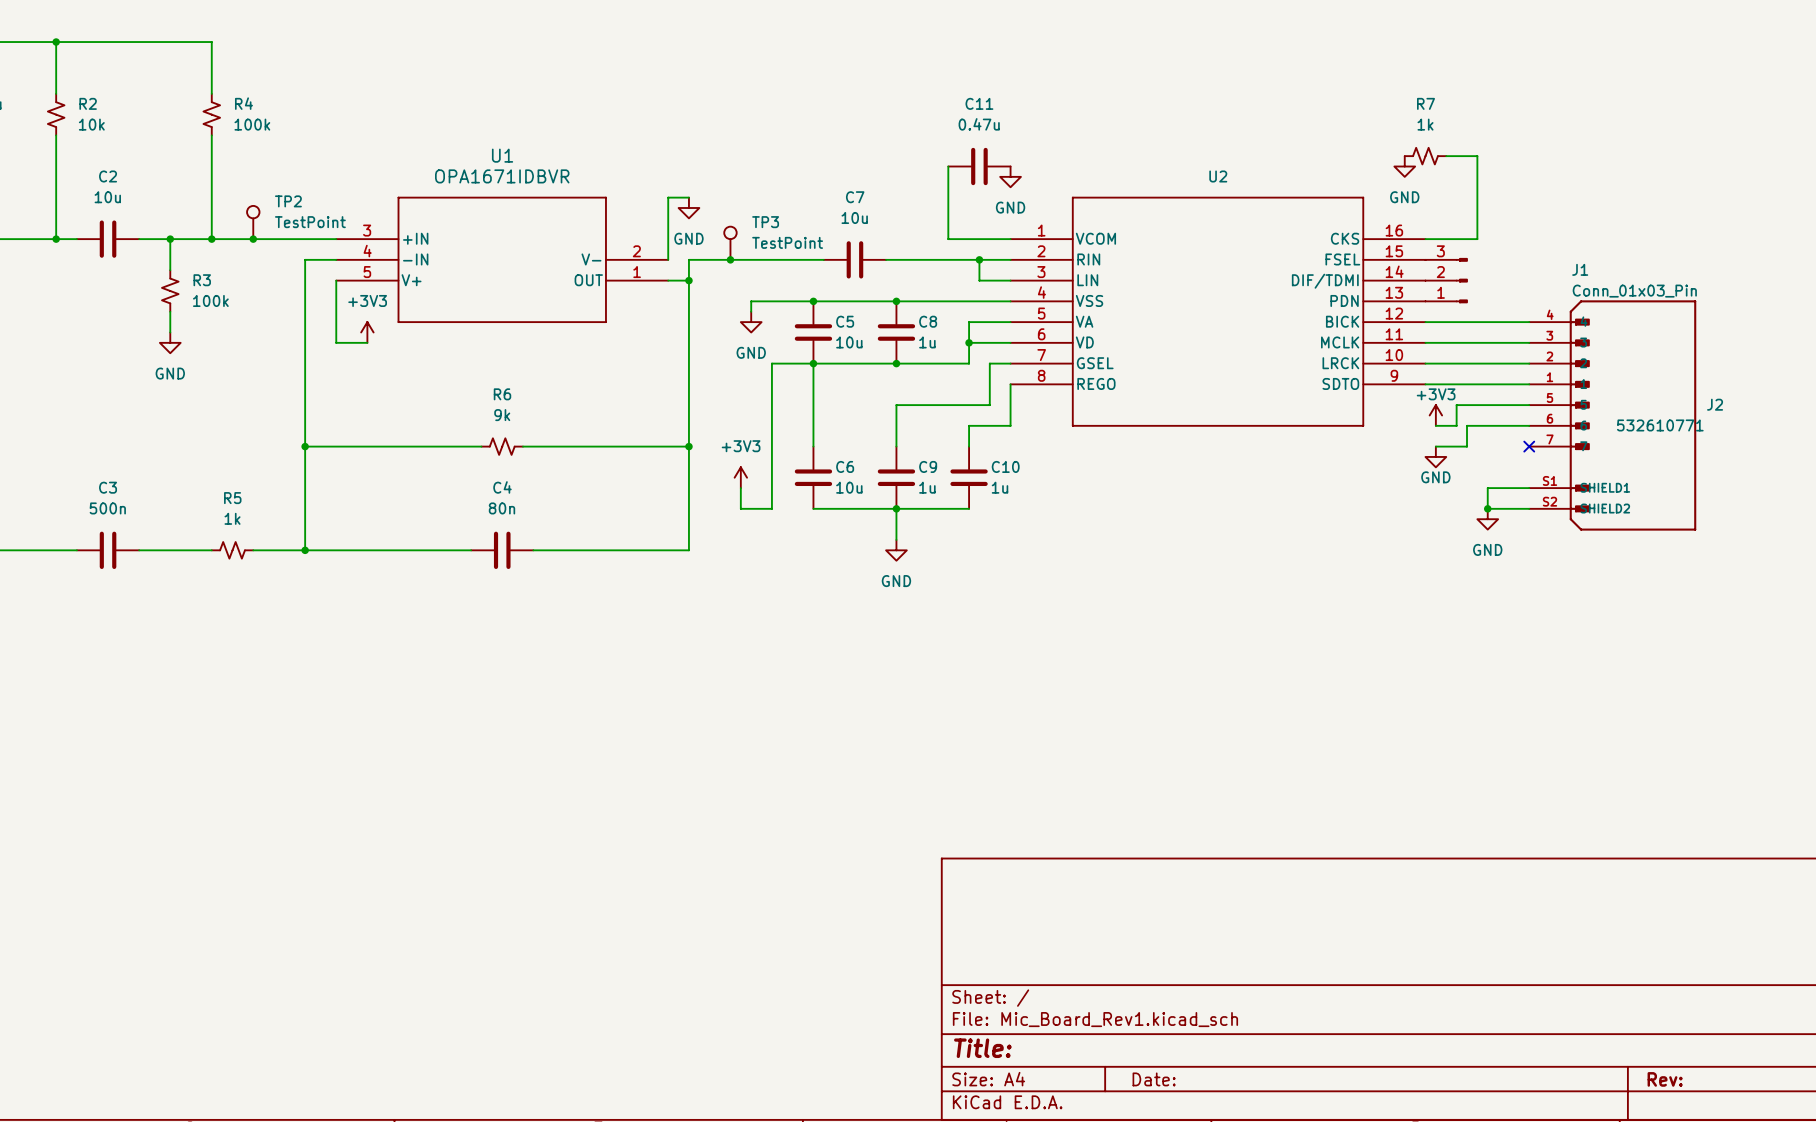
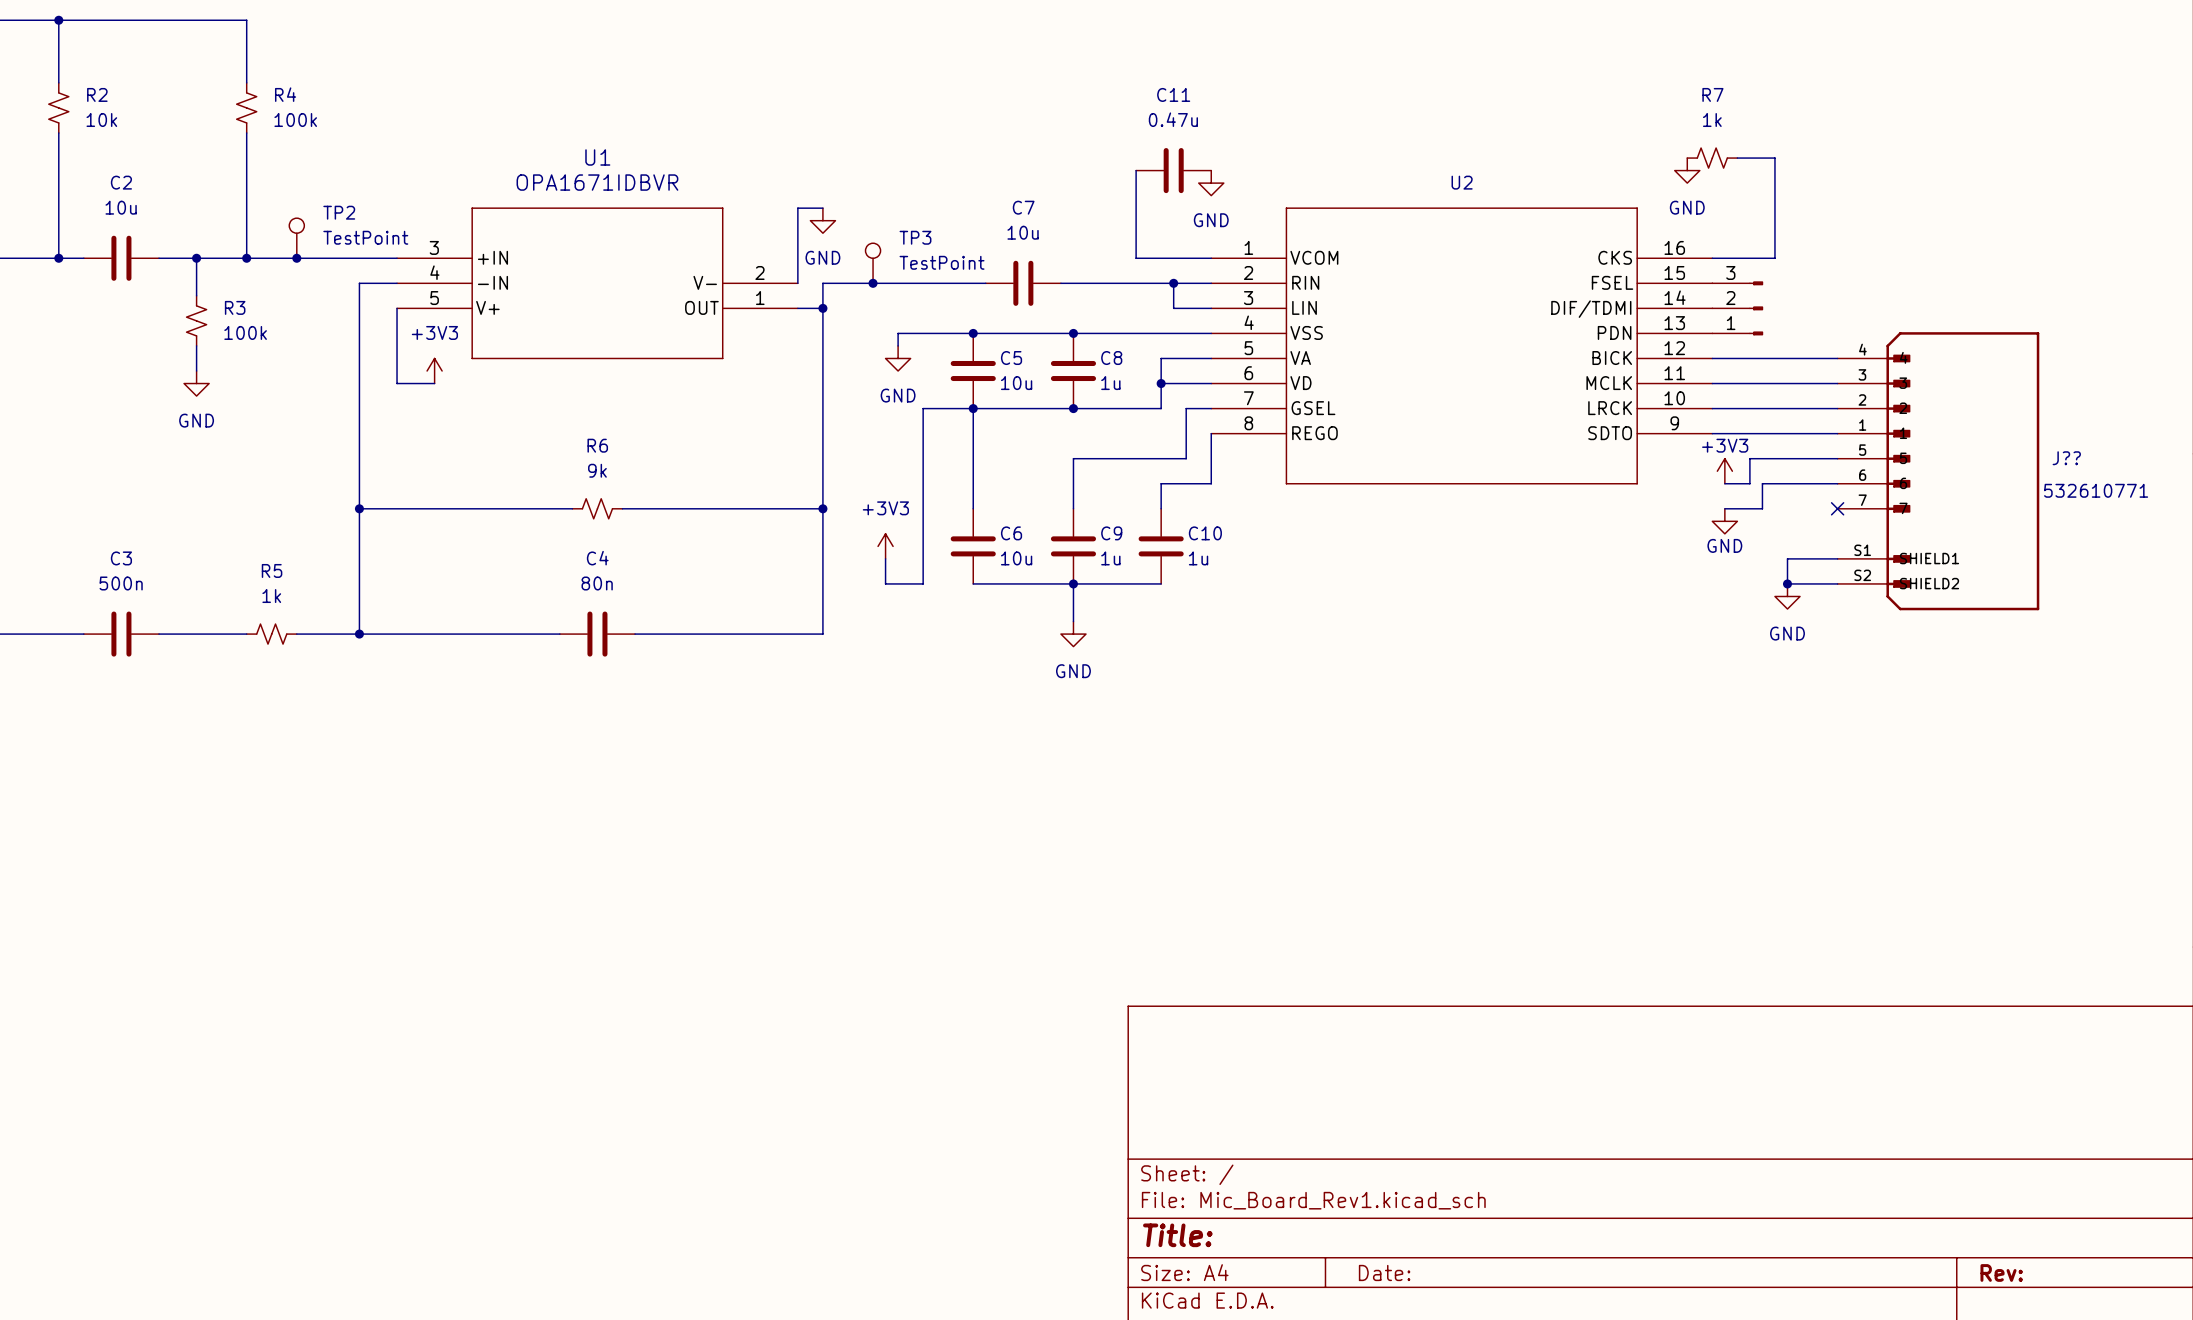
J1 name: J1 (1580, 269) -> none
J1 value: Conn_01x03_Pin (1634, 291) -> none
J2 name: J2 (1715, 404) -> J?? (2066, 458)
J2 value position: 532610771 (1660, 425) -> 532610771 (2096, 490)

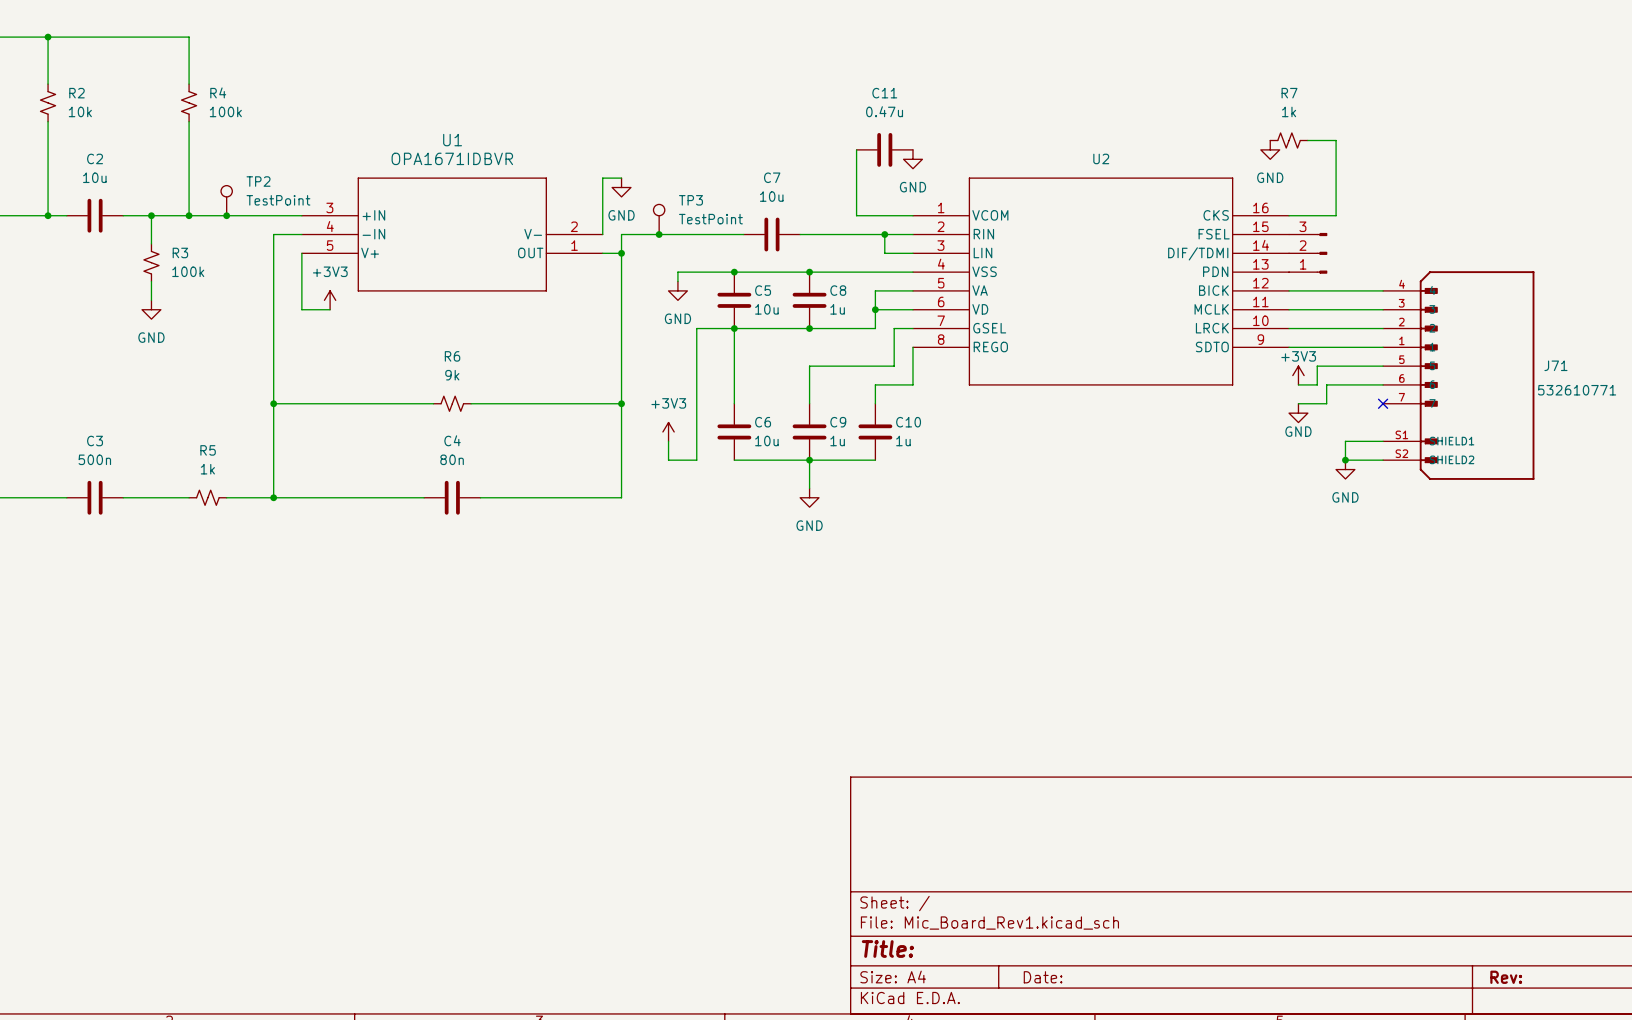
J?? name: J?? (2066, 458) -> J71 (1555, 365)

